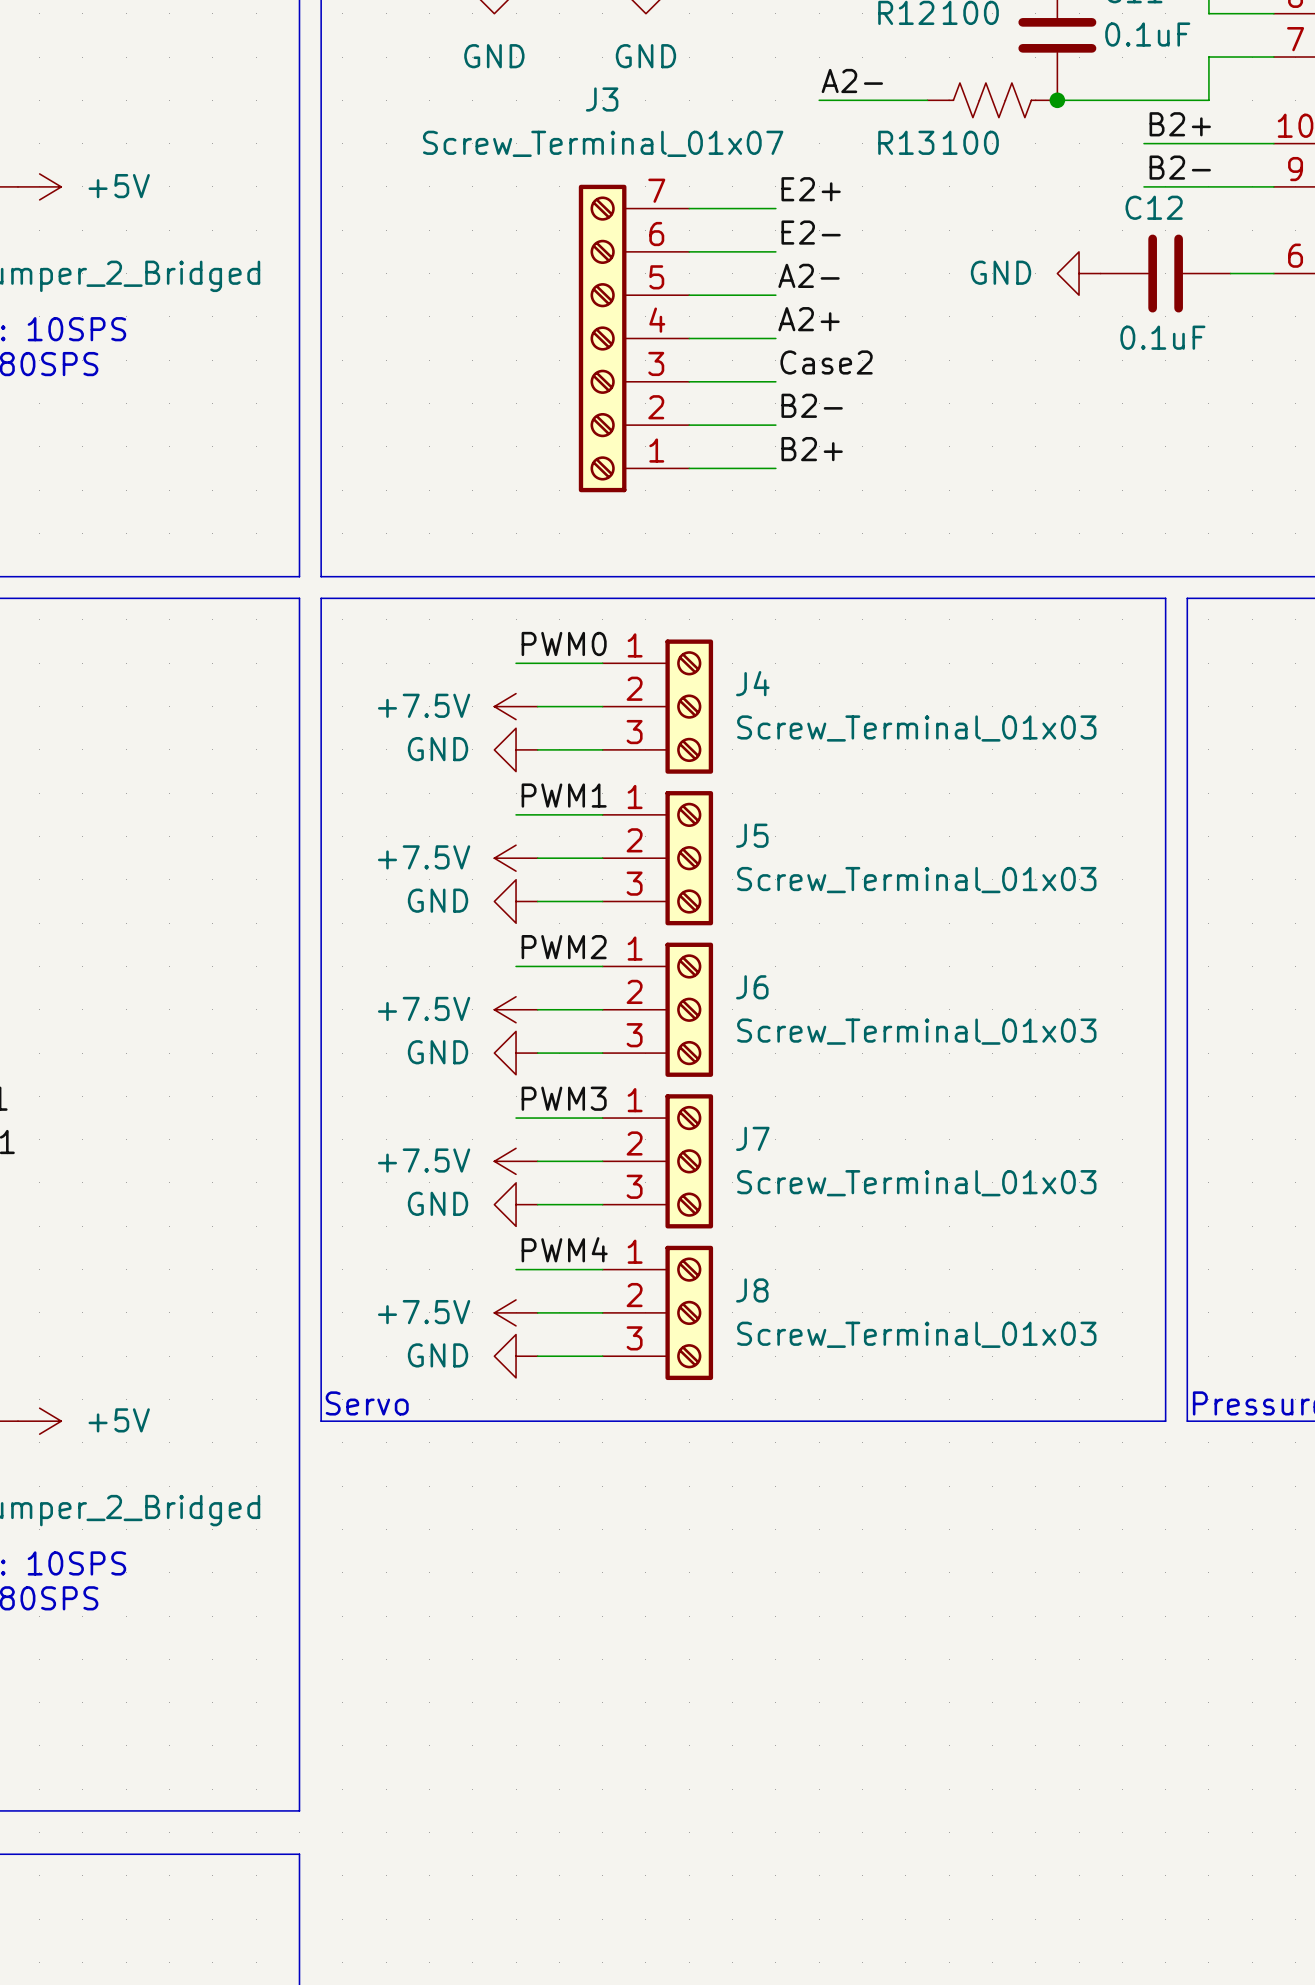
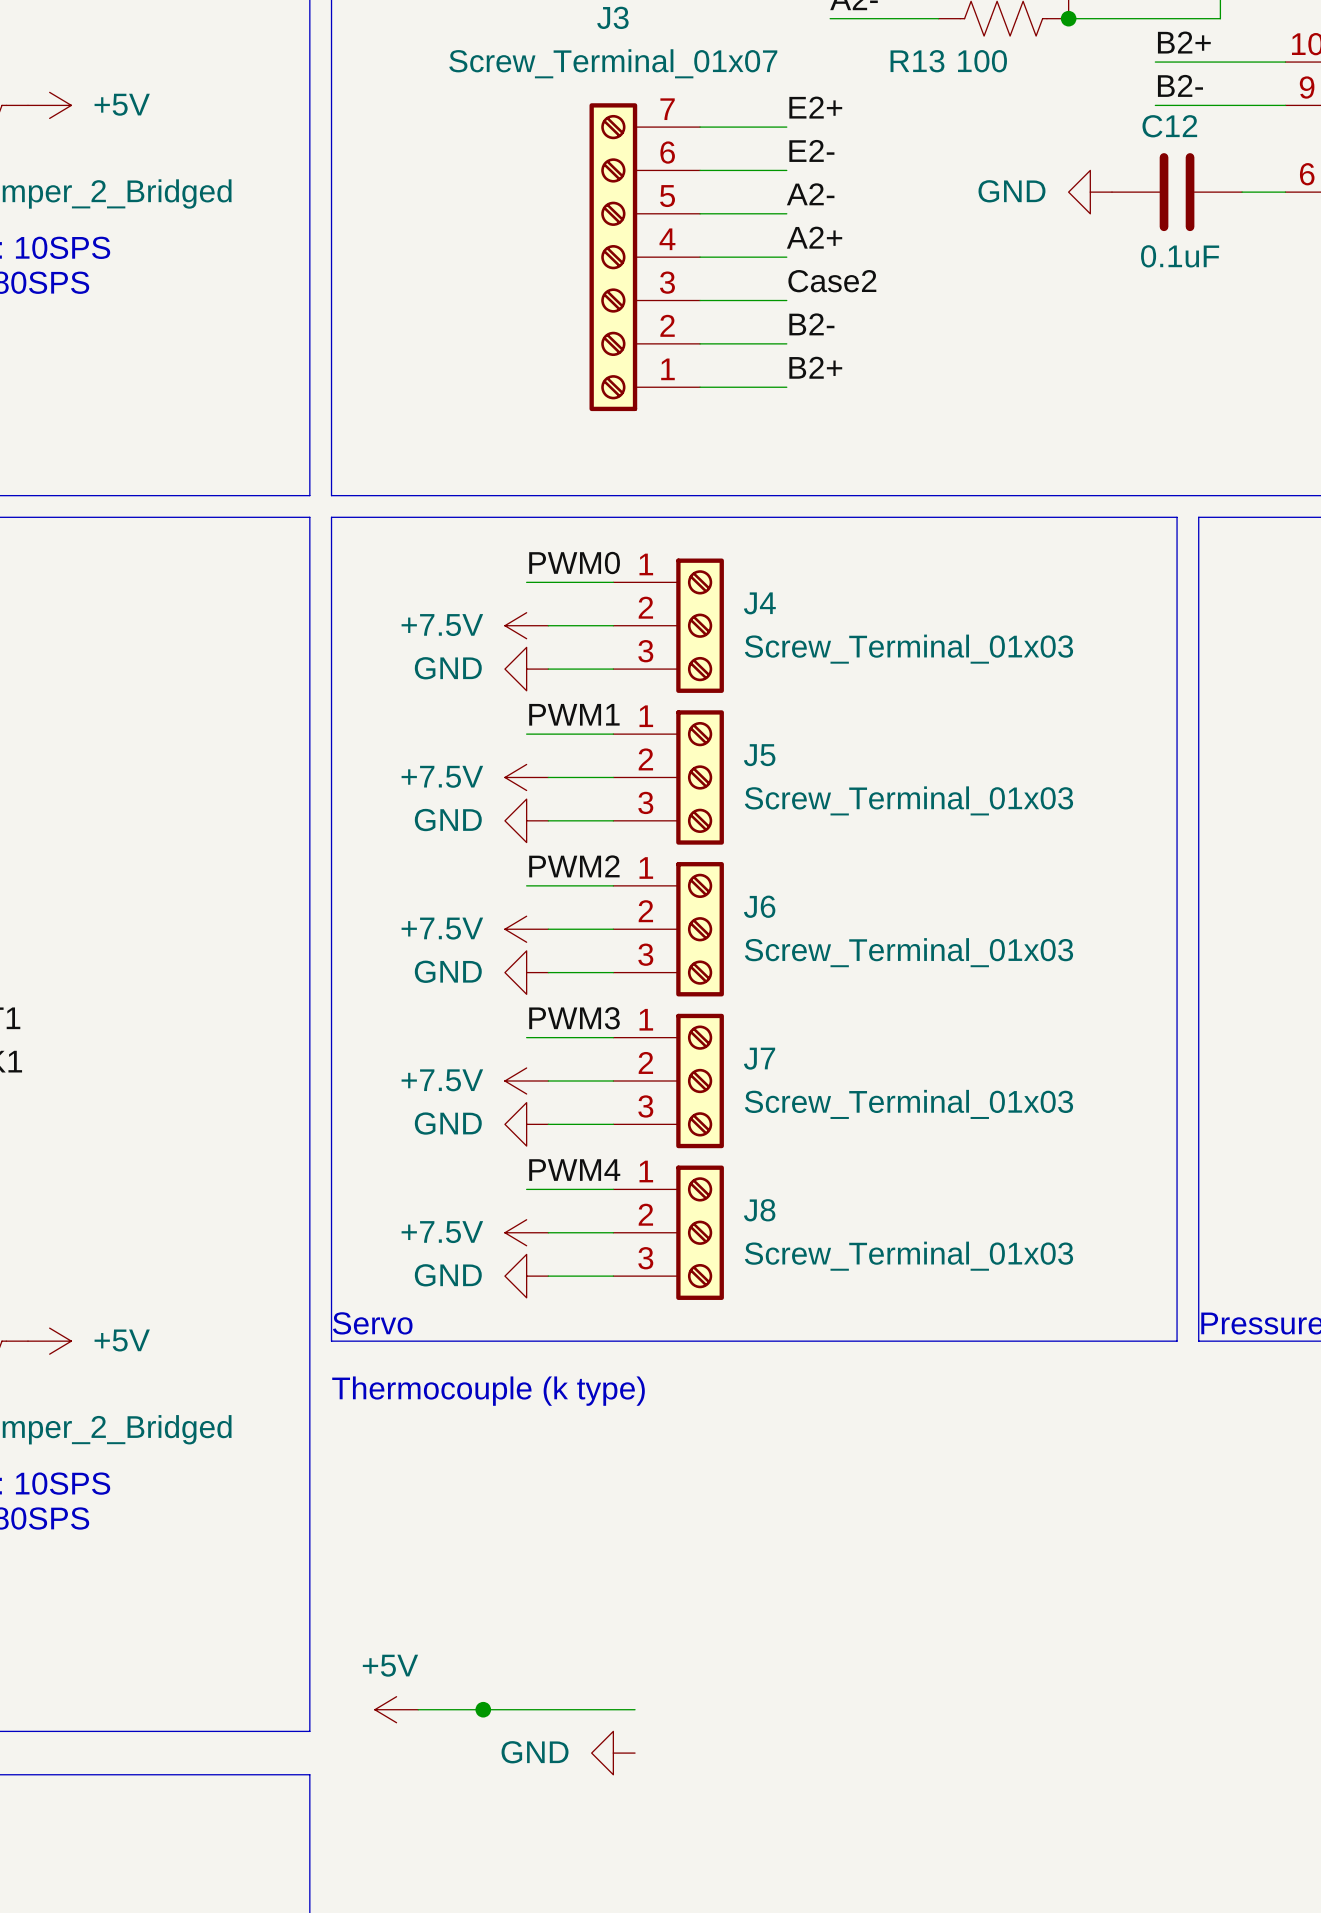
text: none -> Thermocouple (k type) (488, 1391)
power symbol: none -> +5V (396, 1709)
wire: none -> (418, 1709) (635, 1709)
junction: none -> (483, 1709)
power symbol: none -> GND (613, 1753)

